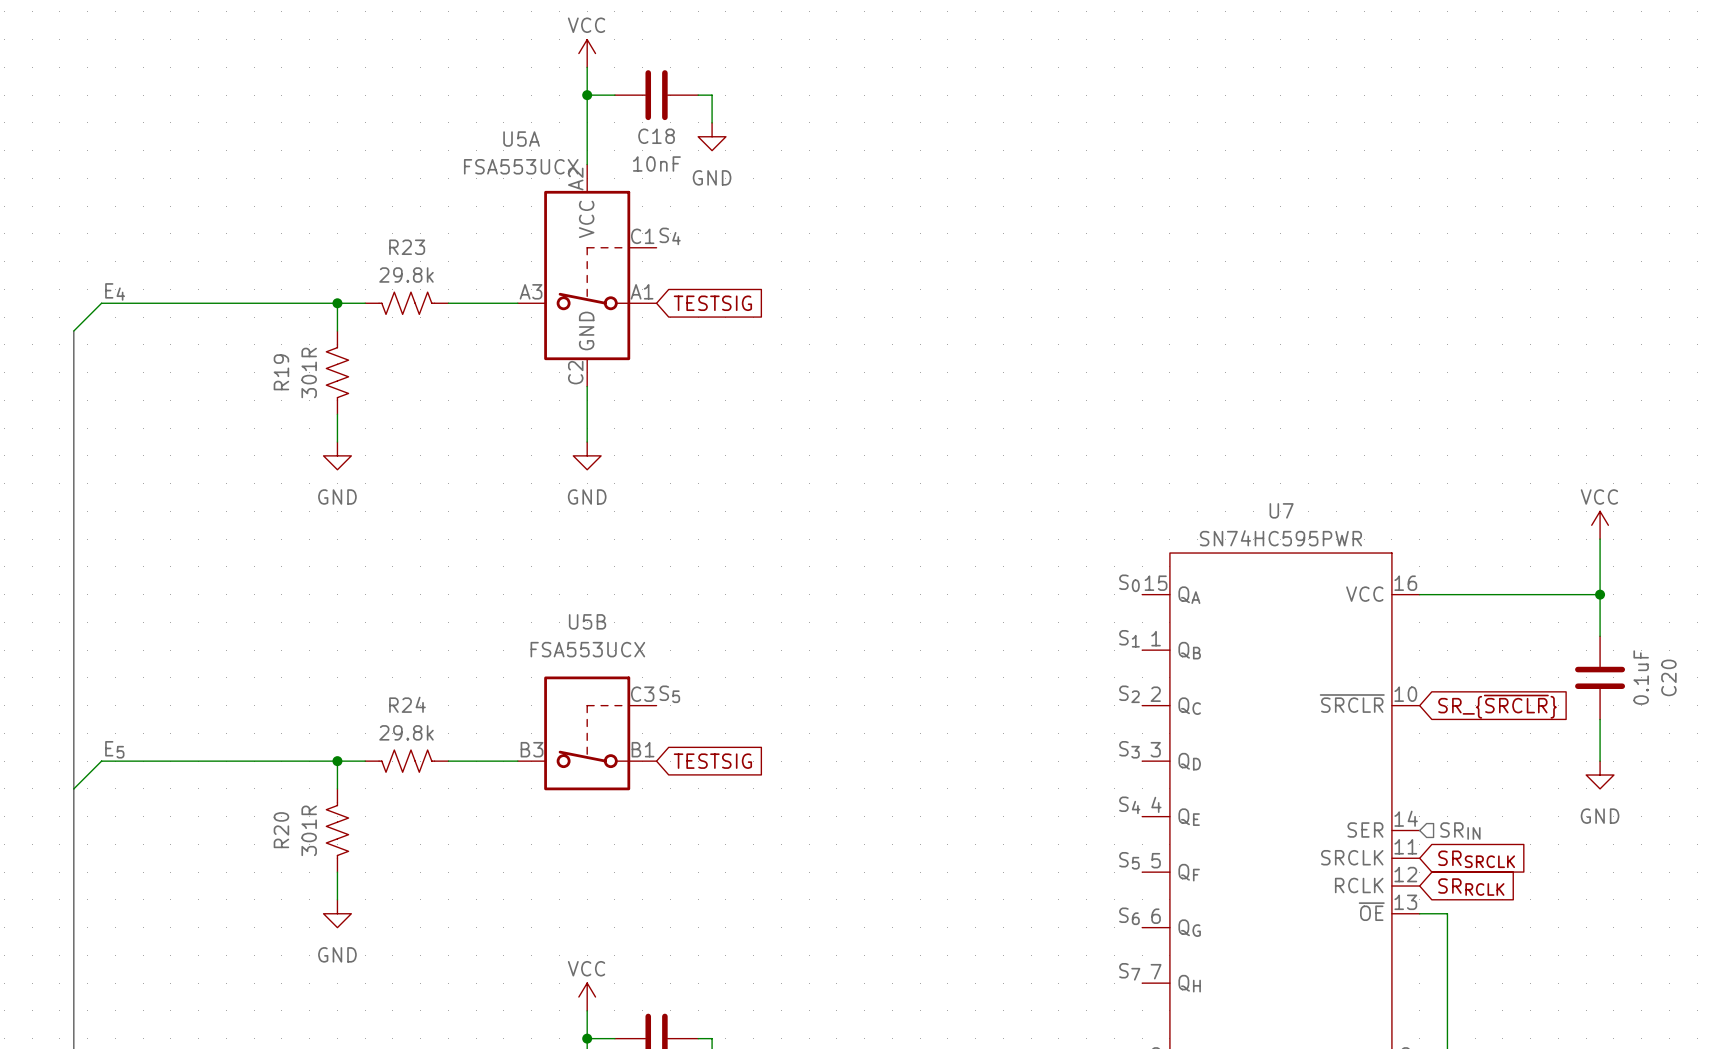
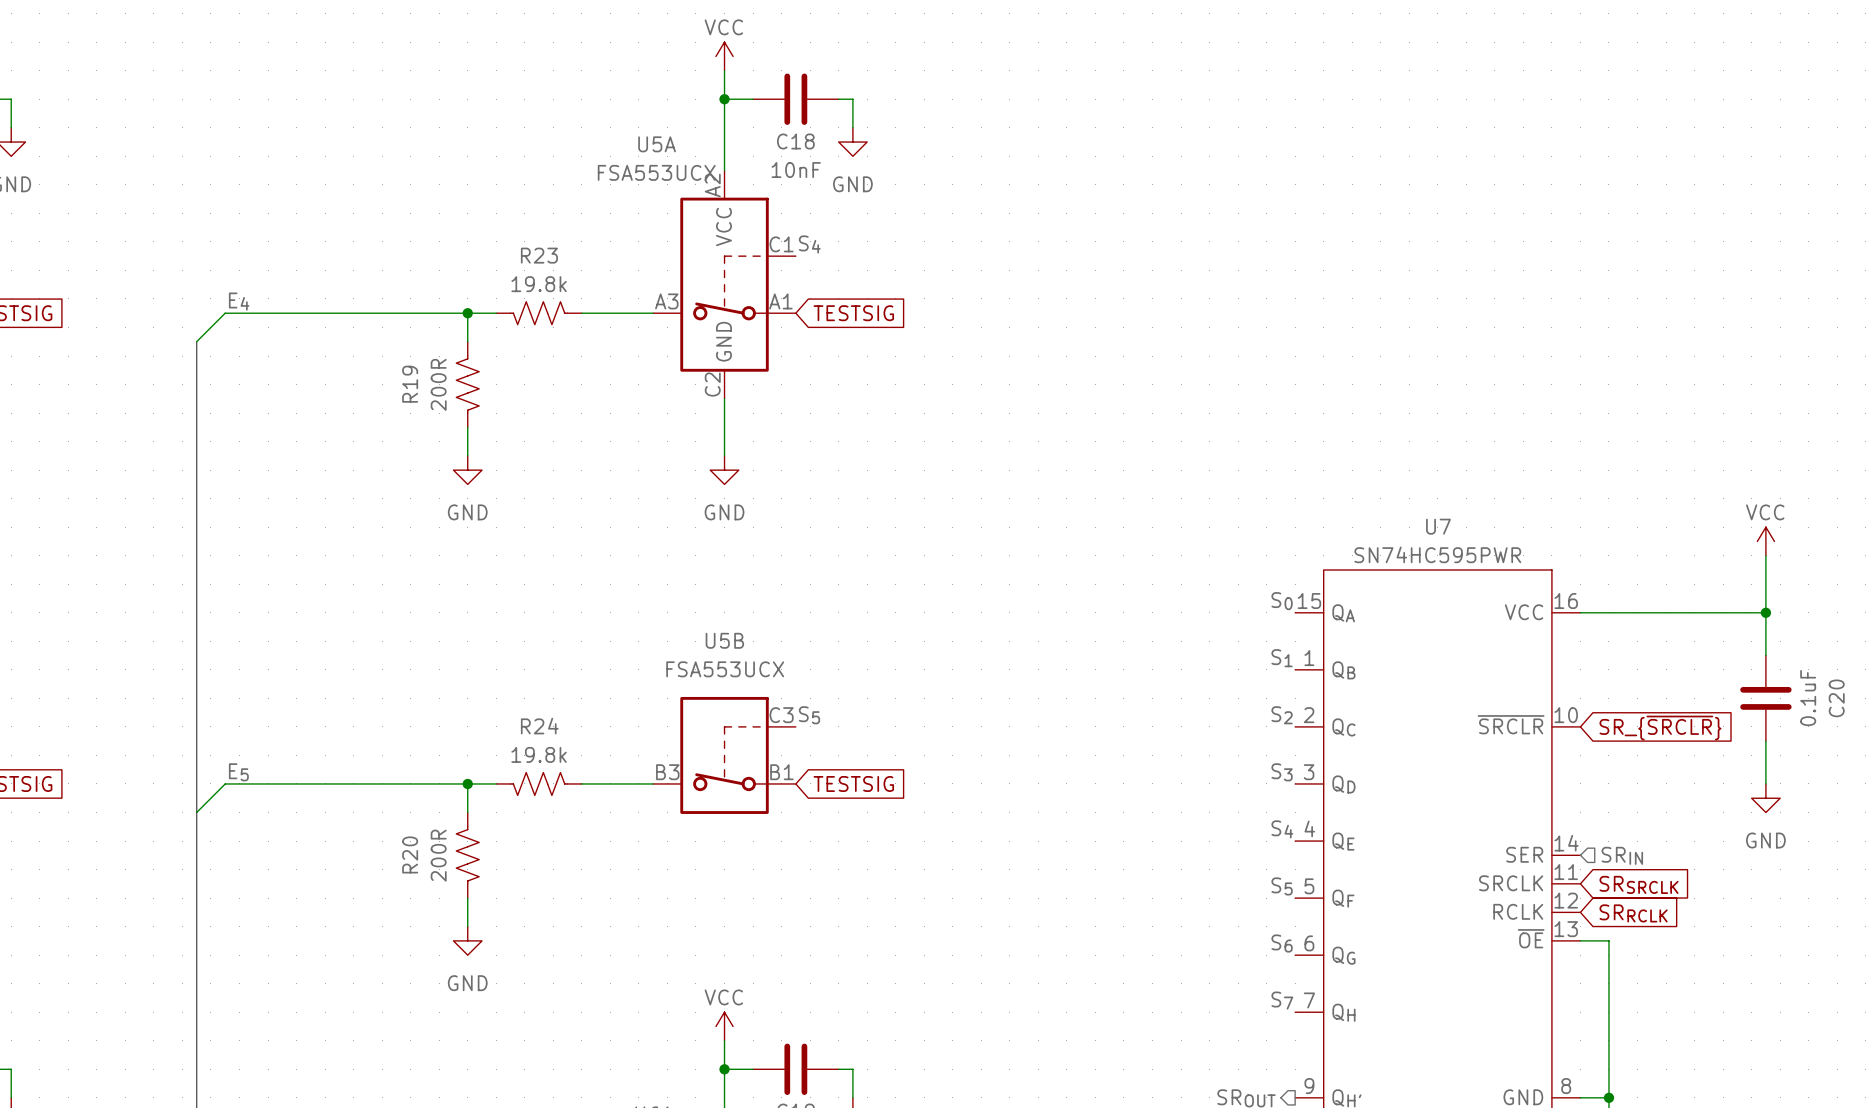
R23 value: 29.8k (406, 274) -> 19.8k (539, 284)
R19 value: 301R (309, 372) -> 200R (438, 384)
R24 value: 29.8k (406, 732) -> 19.8k (539, 754)
R20 value: 301R (309, 830) -> 200R (438, 855)

